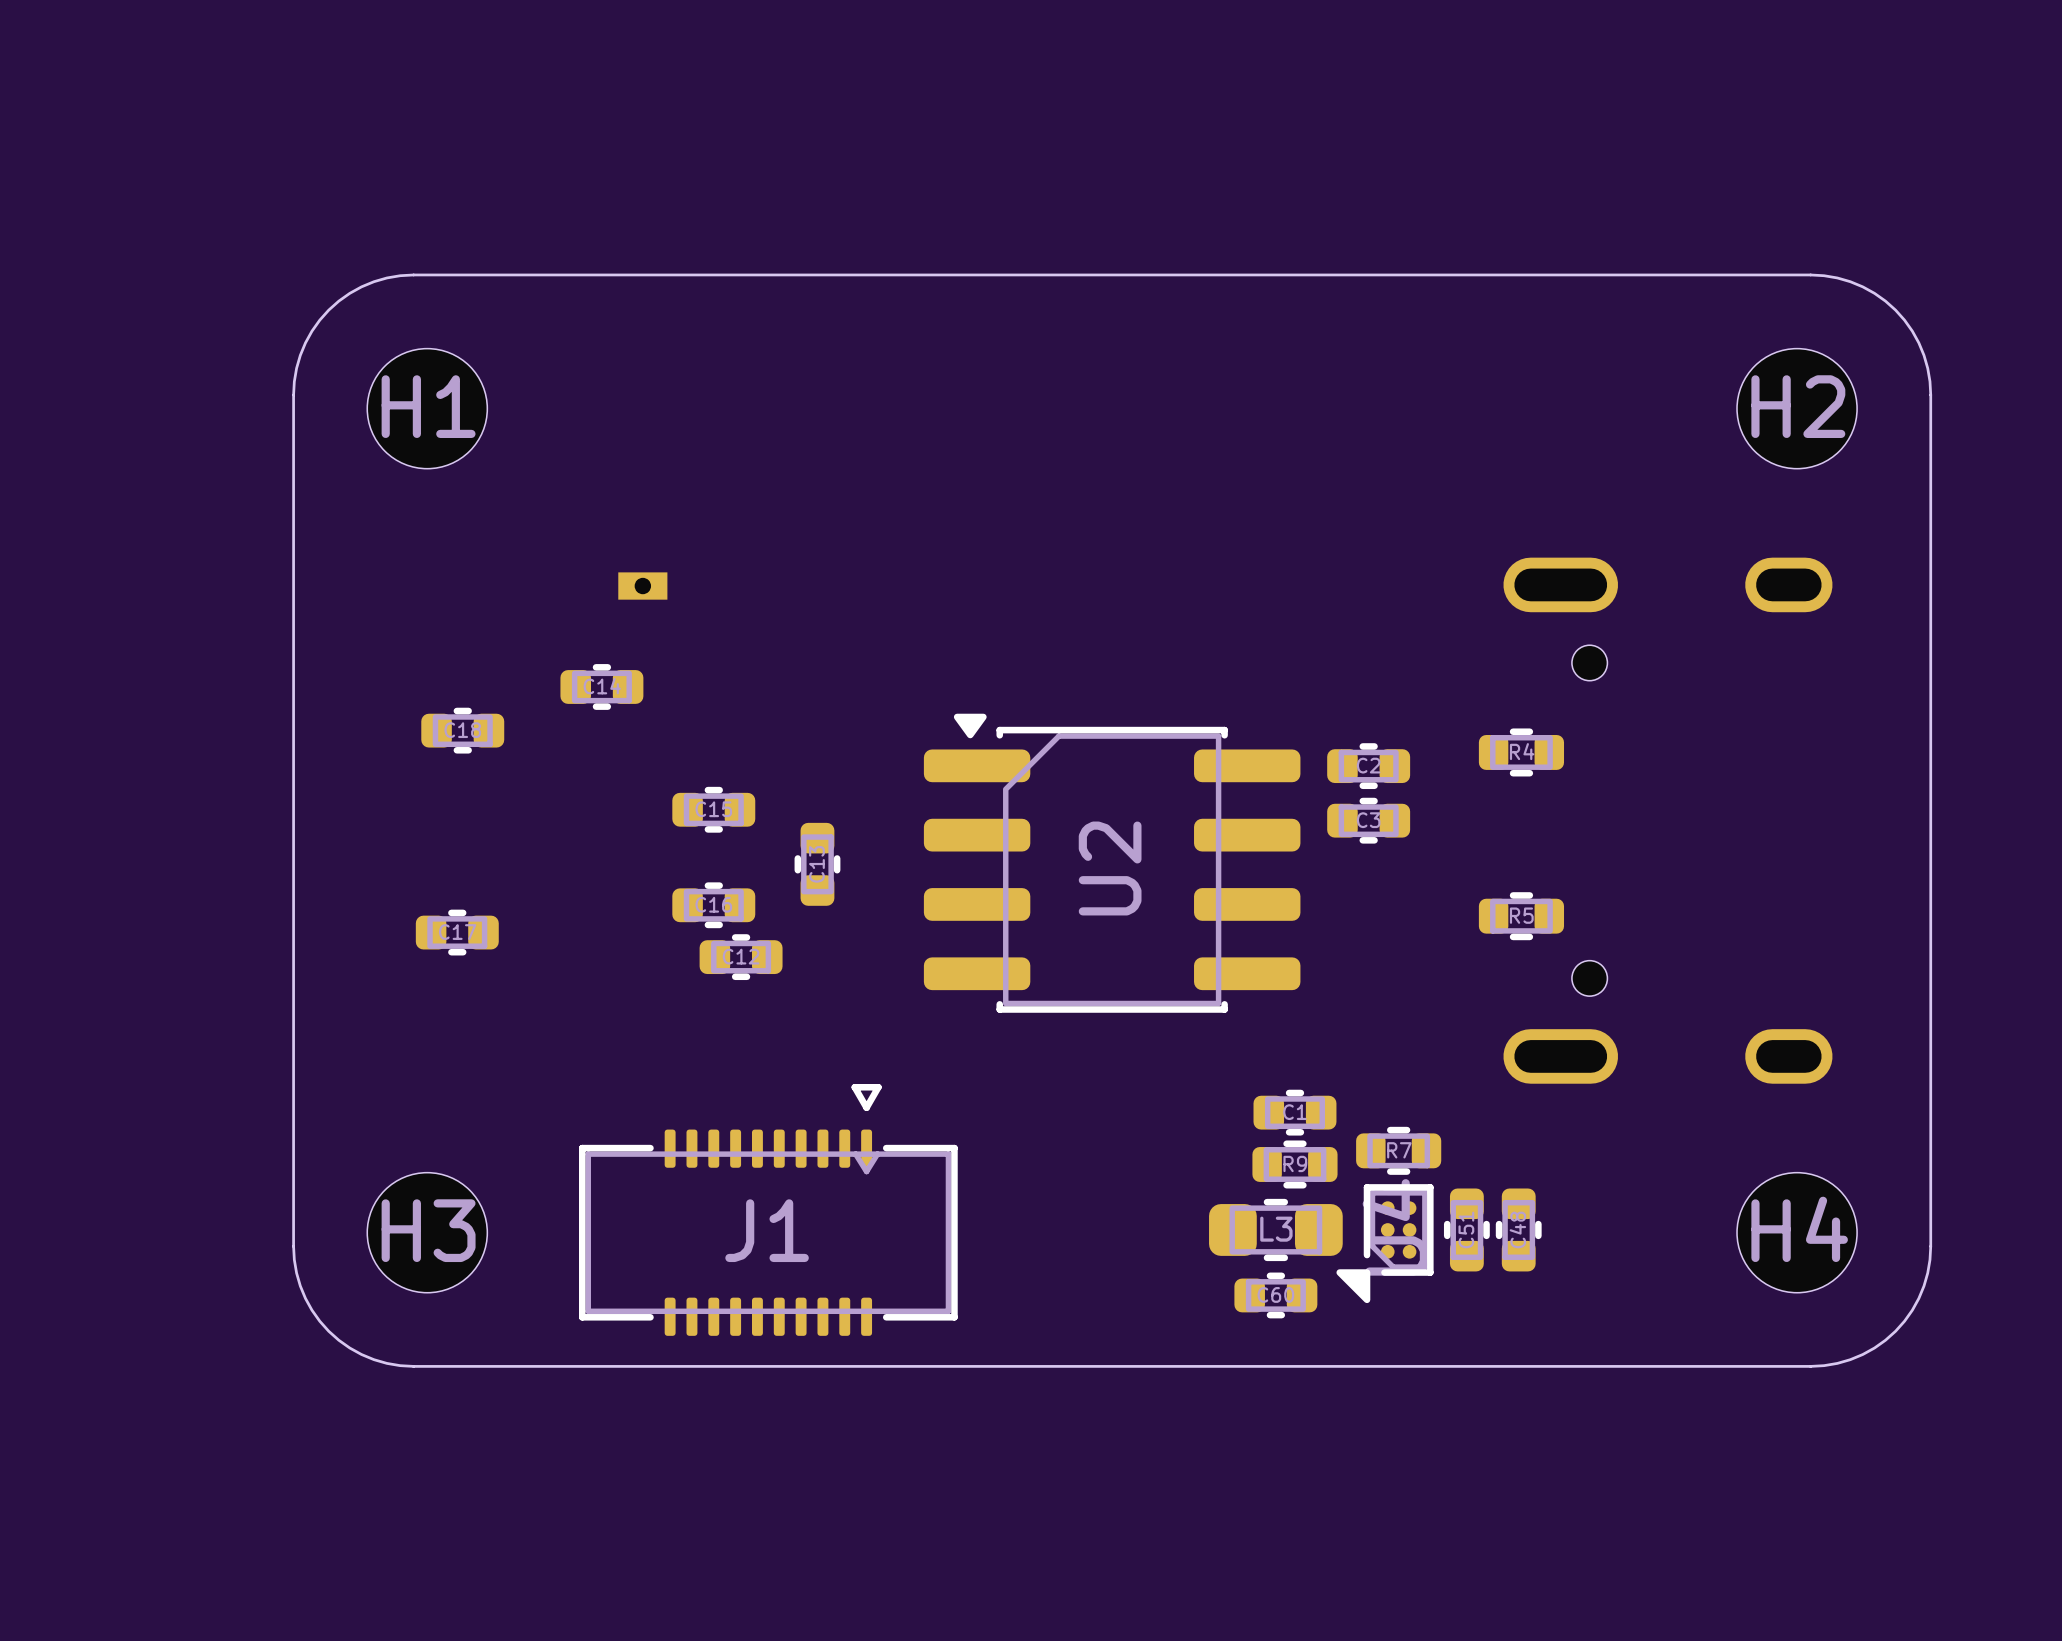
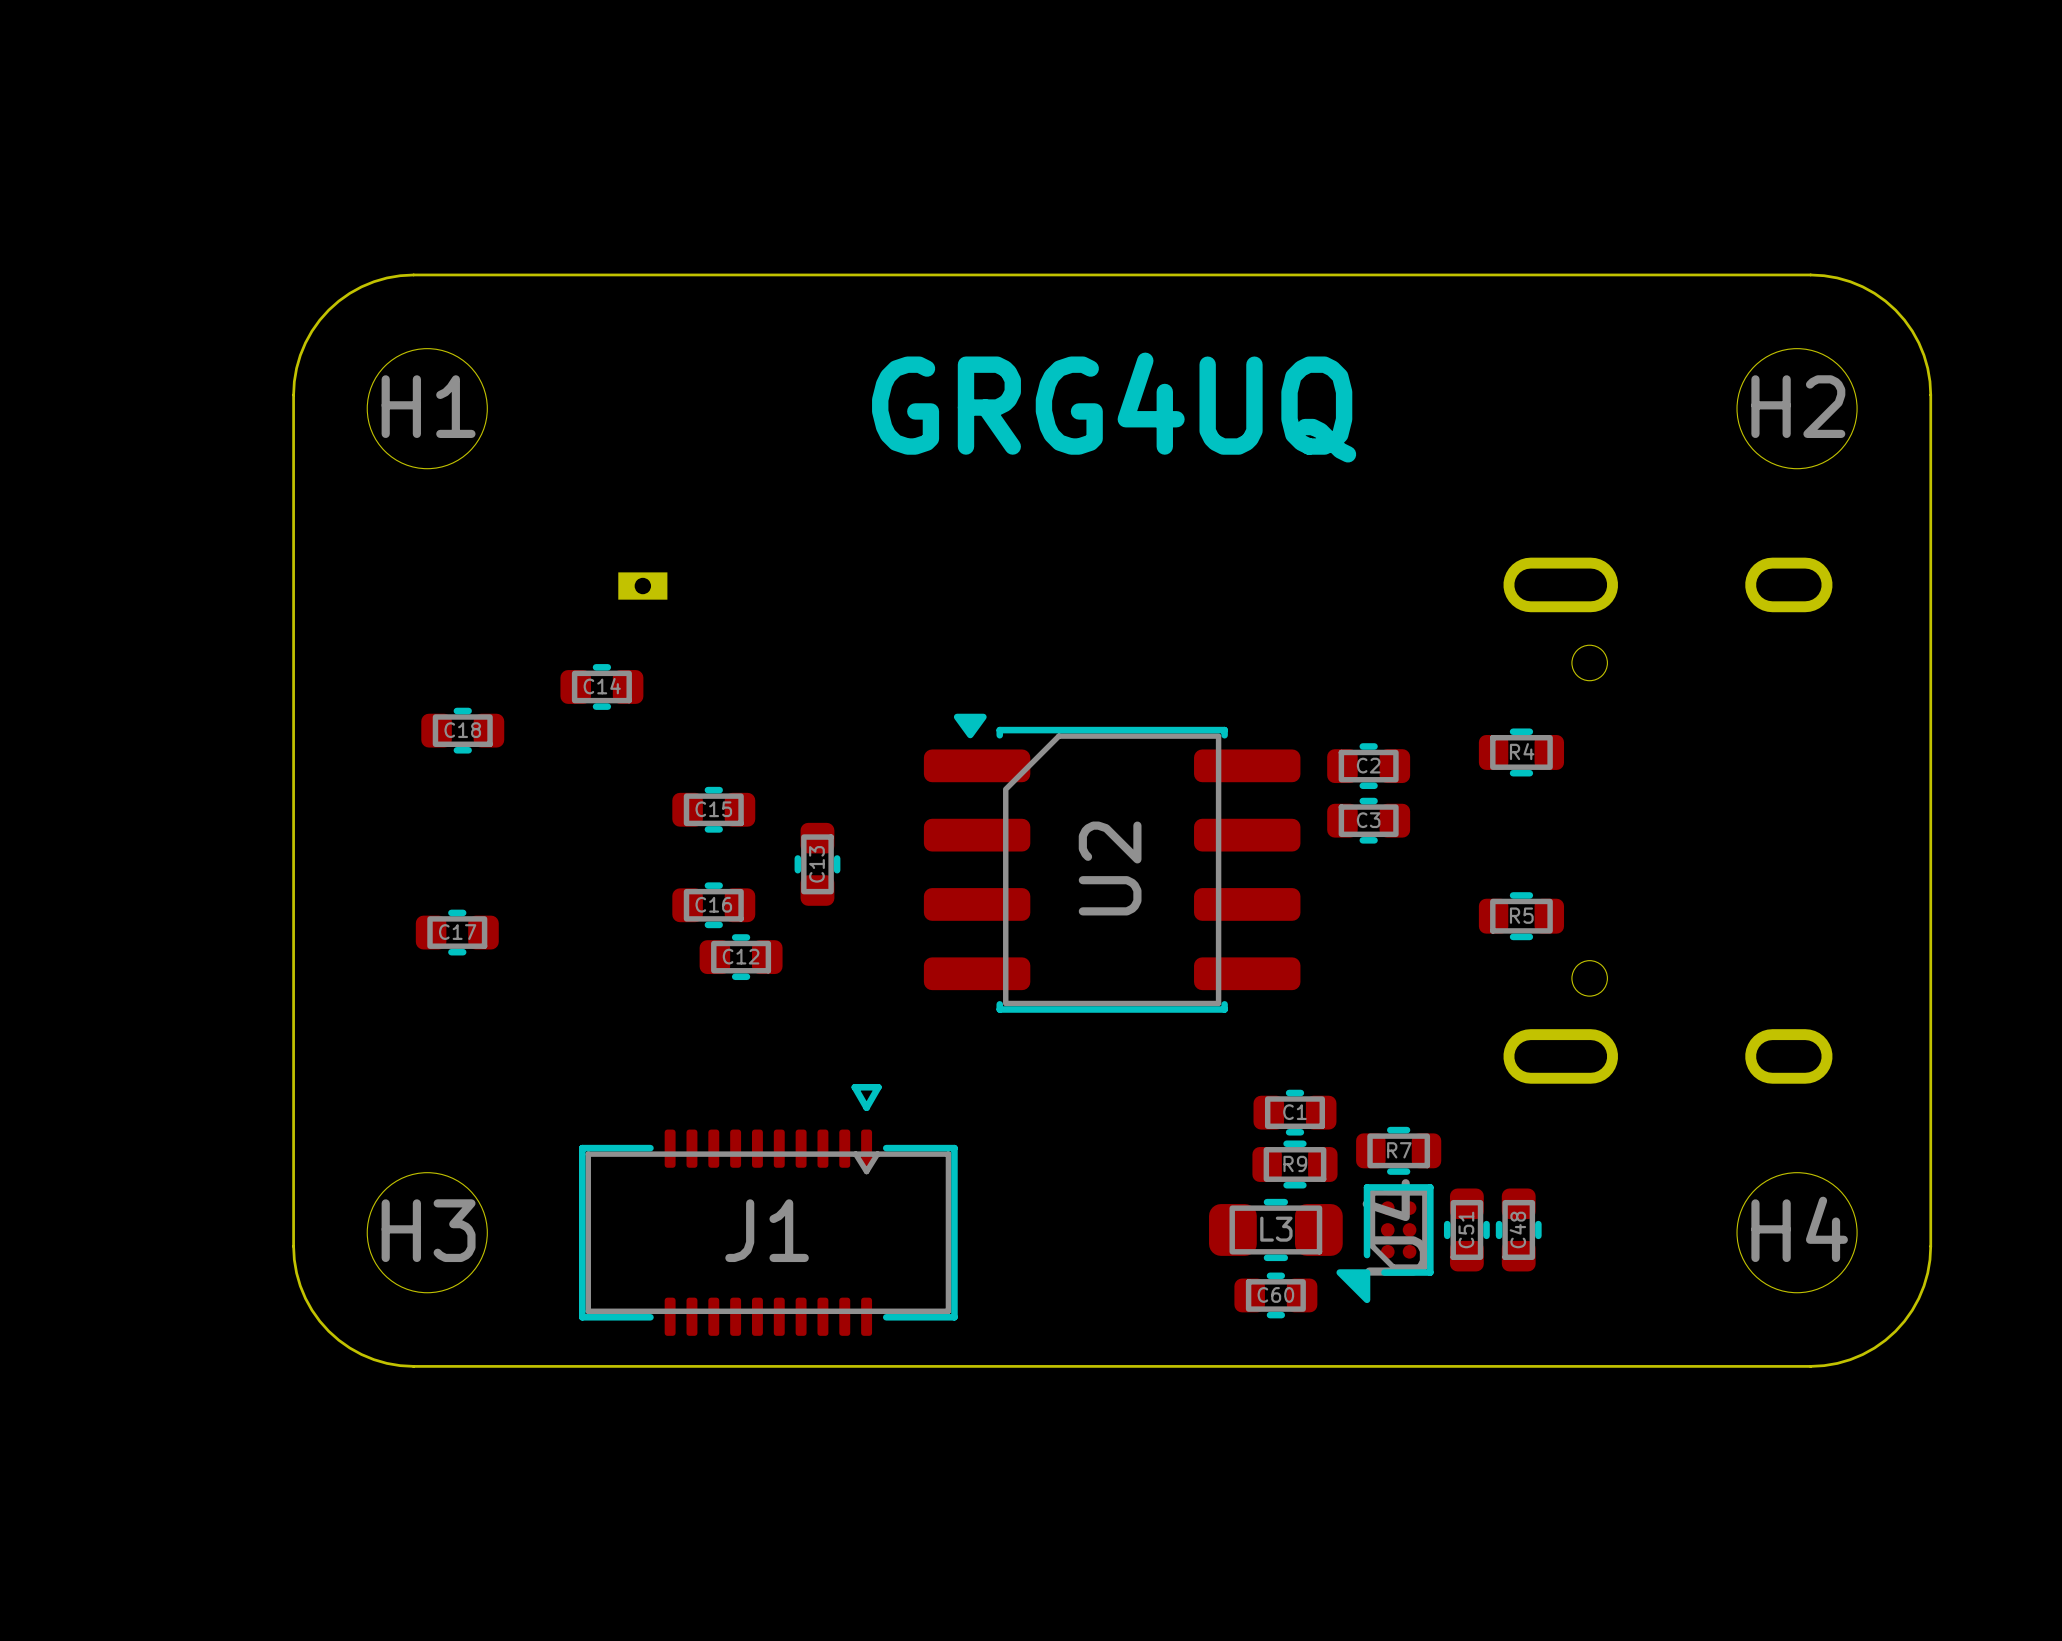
text: none -> GRG4UQ (1114, 407)

